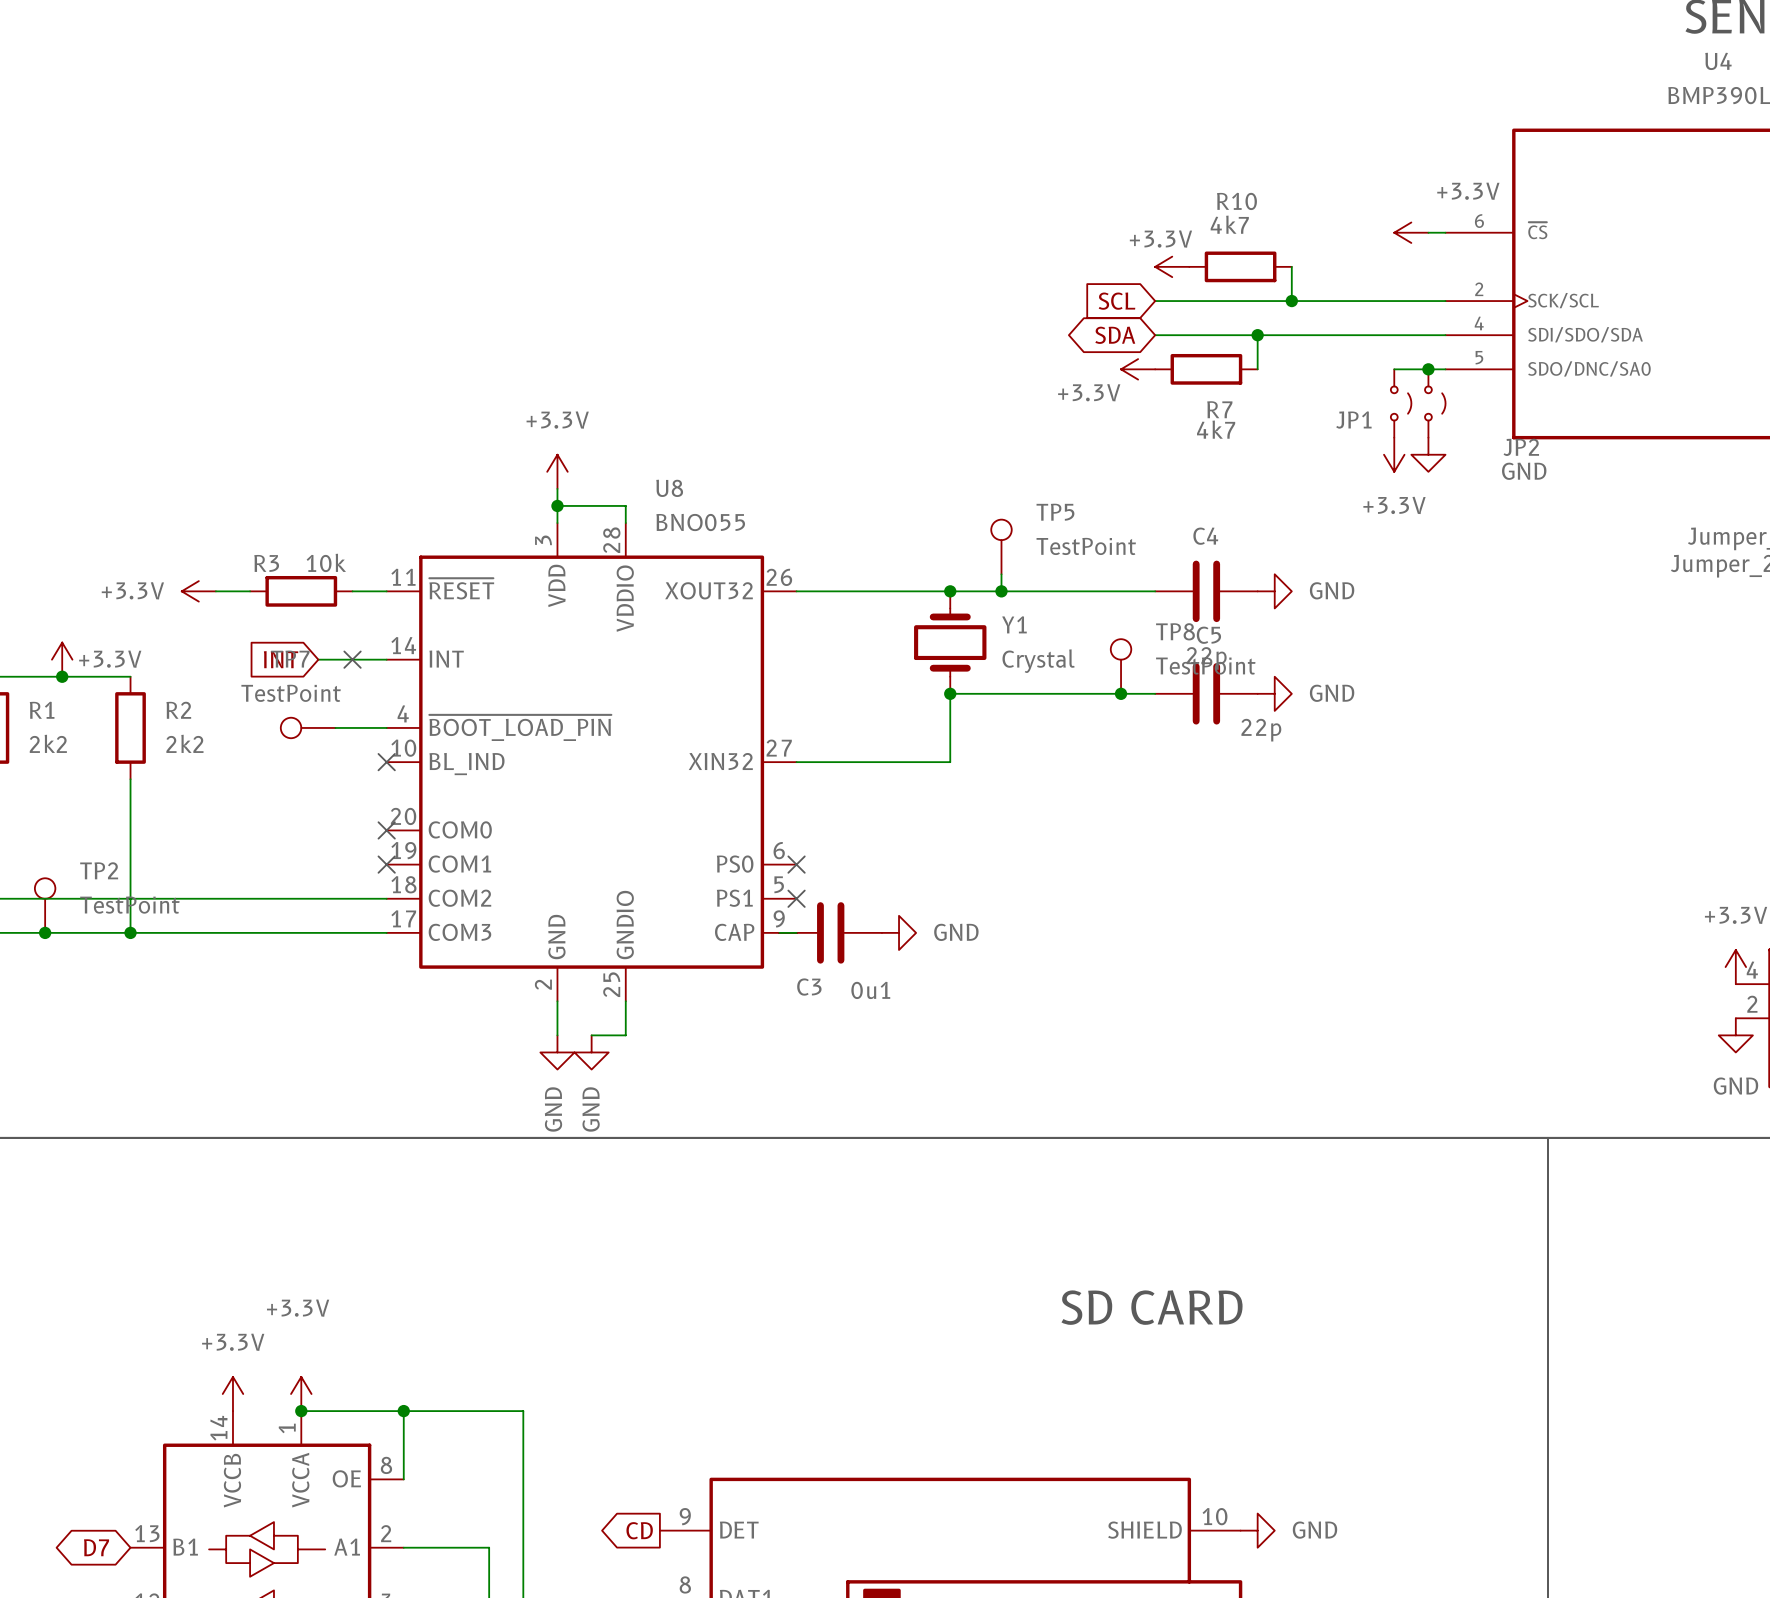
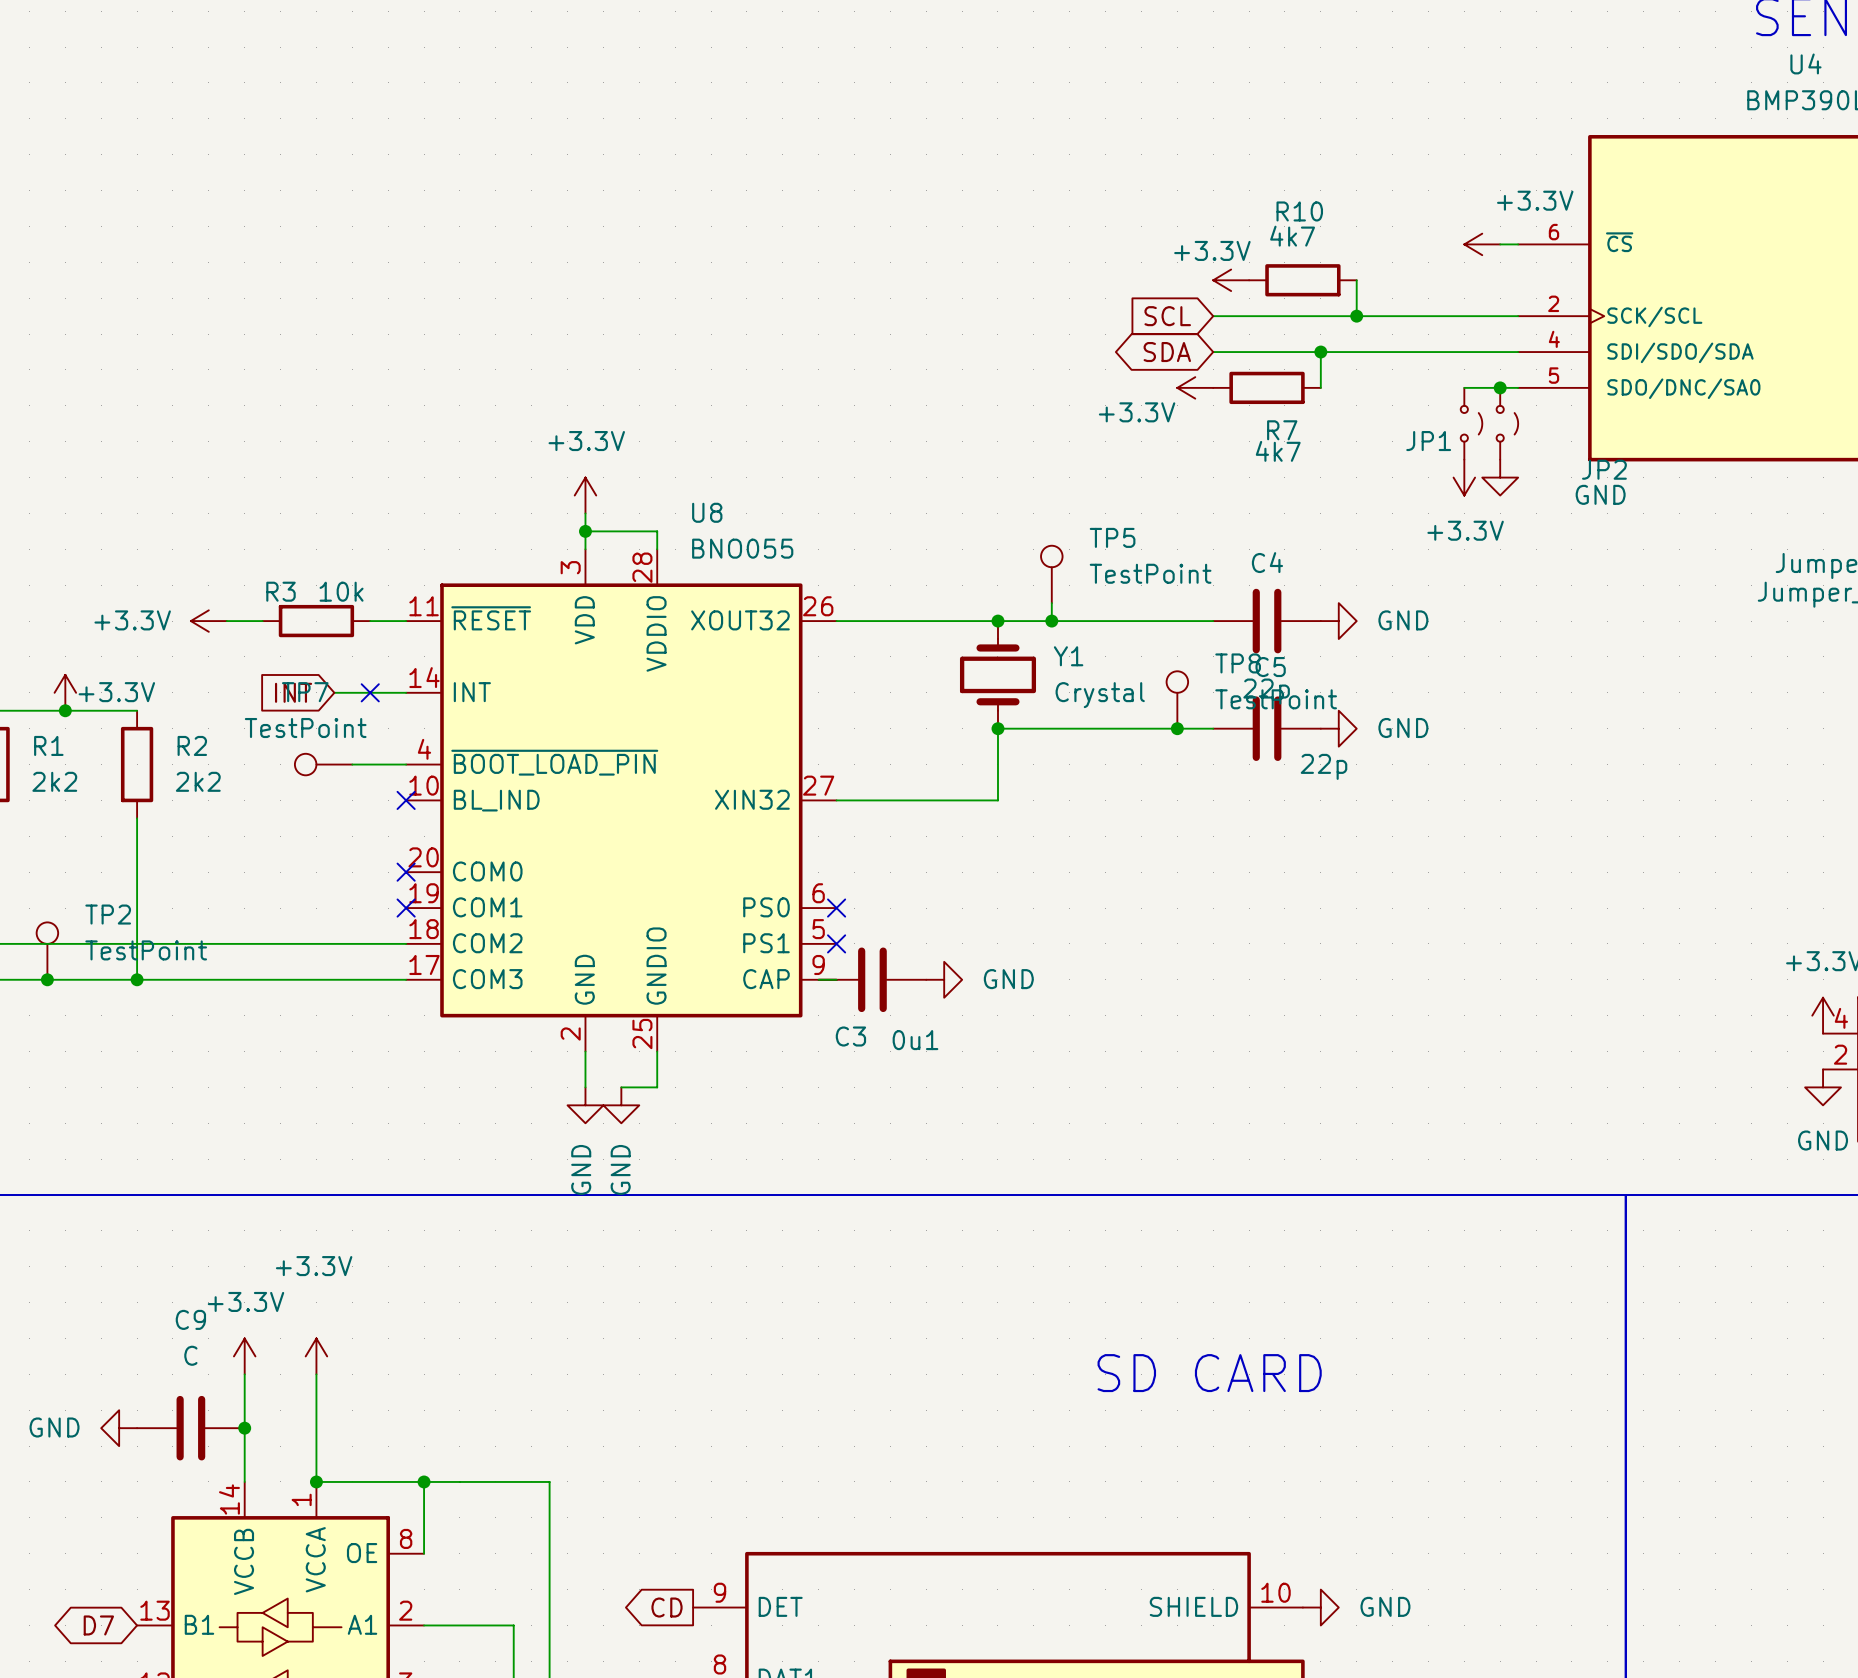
power symbol: none -> +3.3V (244, 1356)
power symbol: none -> +3.3V (316, 1356)
wire: none -> (244, 1374) (244, 1481)
wire: none -> (316, 1374) (316, 1481)
power symbol: none -> GND (119, 1428)
C9: none -> C (190, 1428)
junction: none -> (244, 1428)
power symbol: +3.3V (232, 1394) -> none
power symbol: +3.3V (301, 1394) -> none

